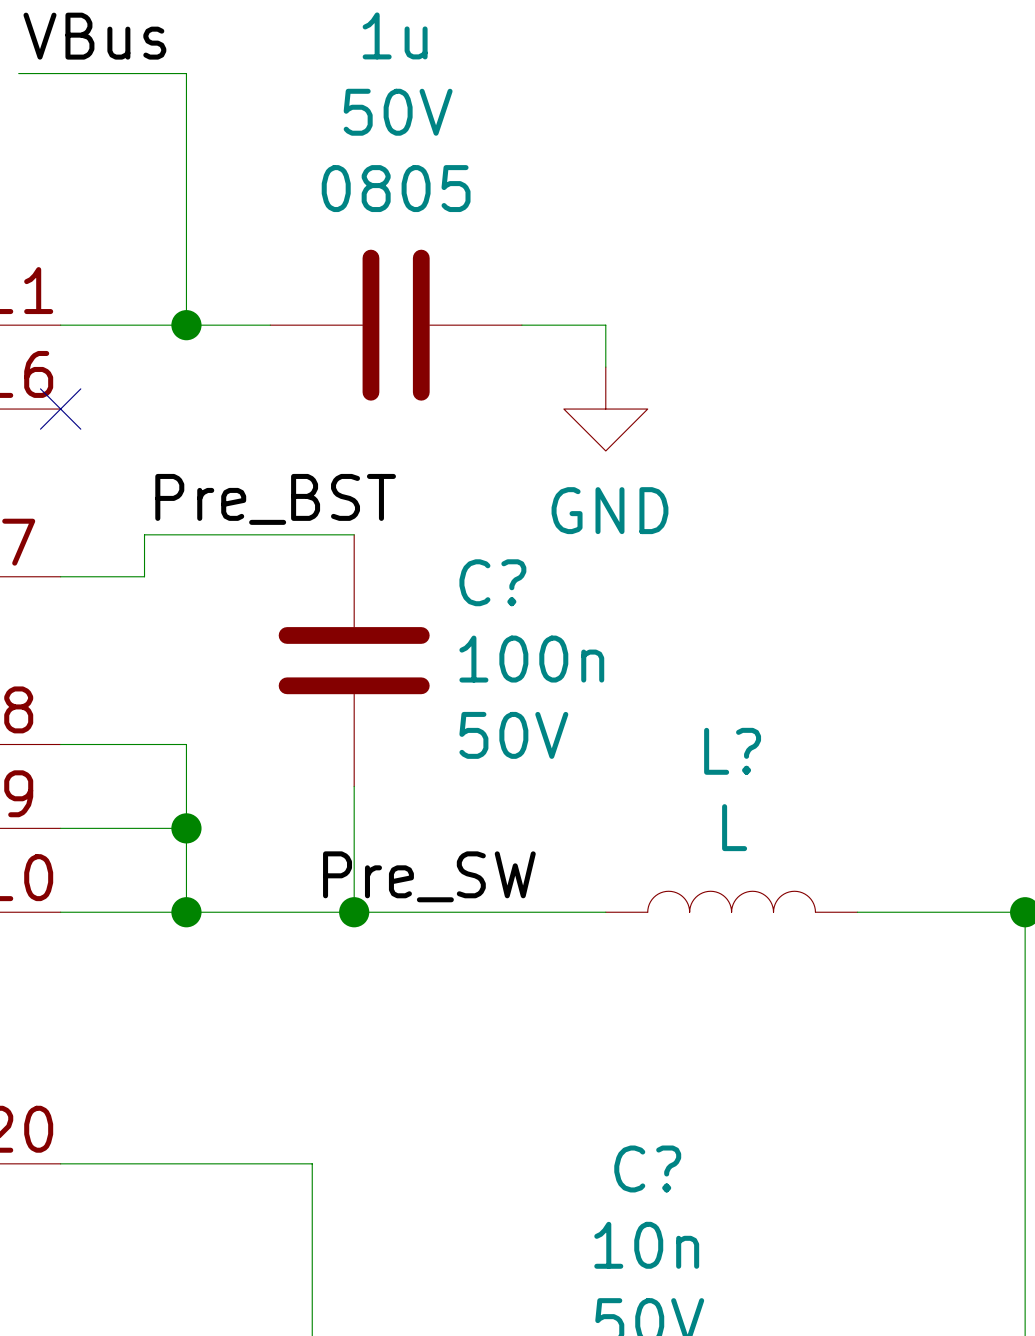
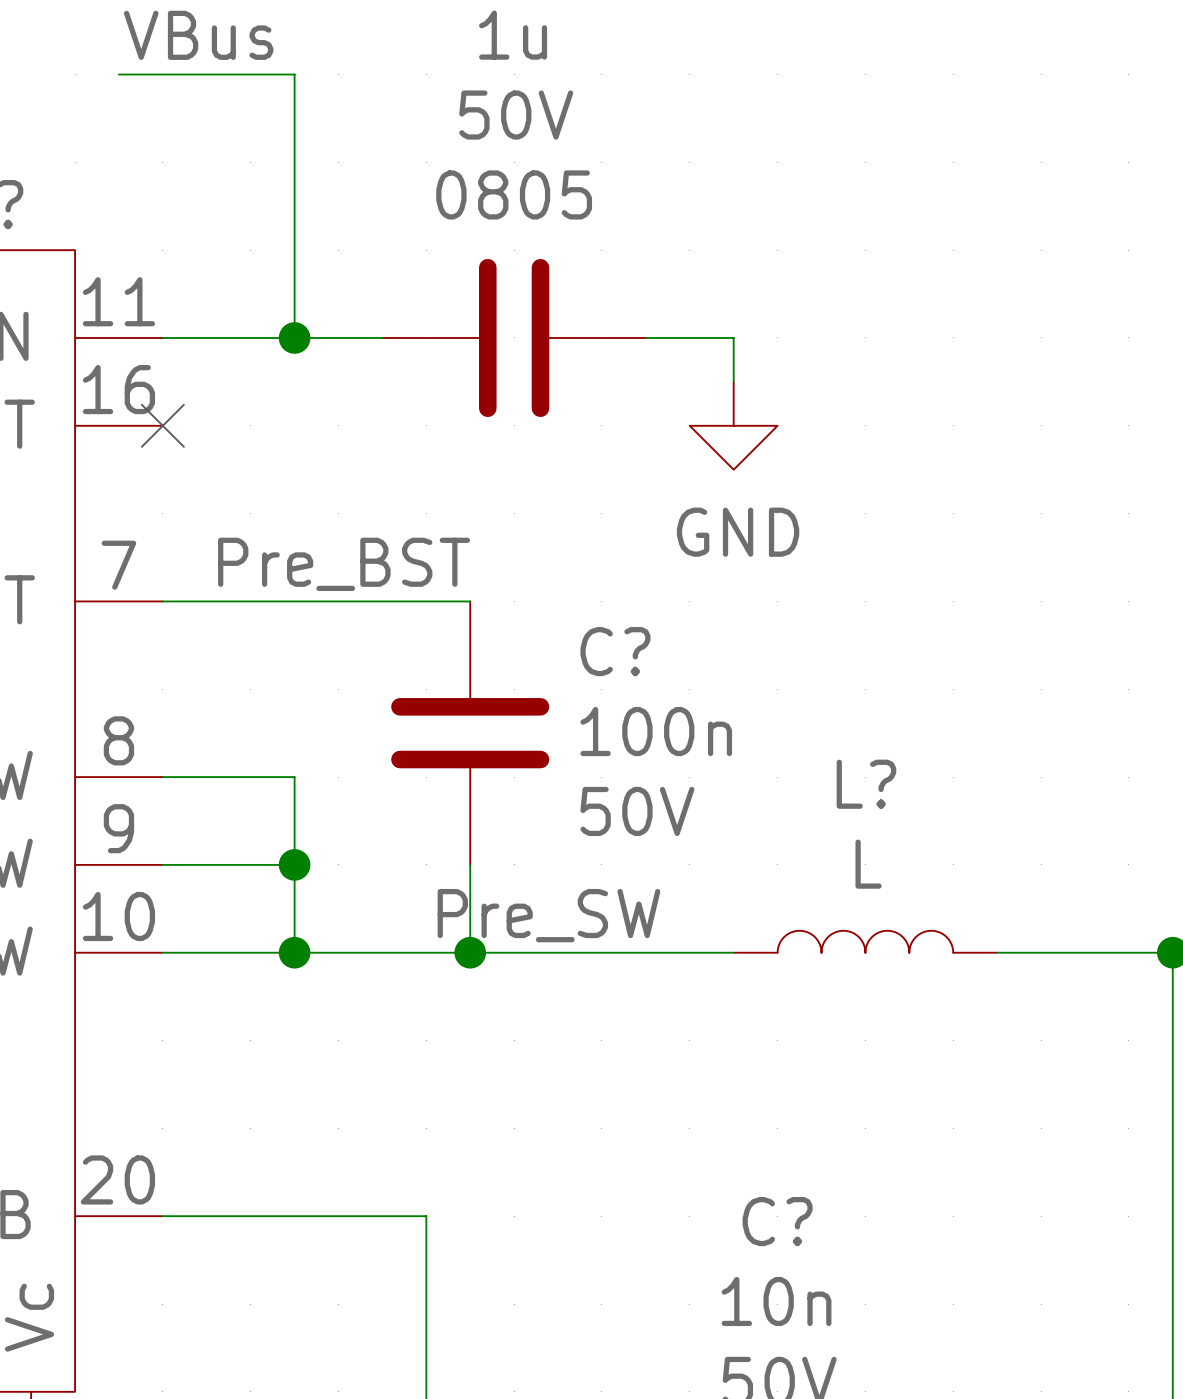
label position: Pre_BST (275, 499) -> Pre_BST (344, 564)
wire: (354, 534) (144, 534) (144, 576) -> (470, 601) (250, 601)
C? position: (354, 660) -> (470, 733)

